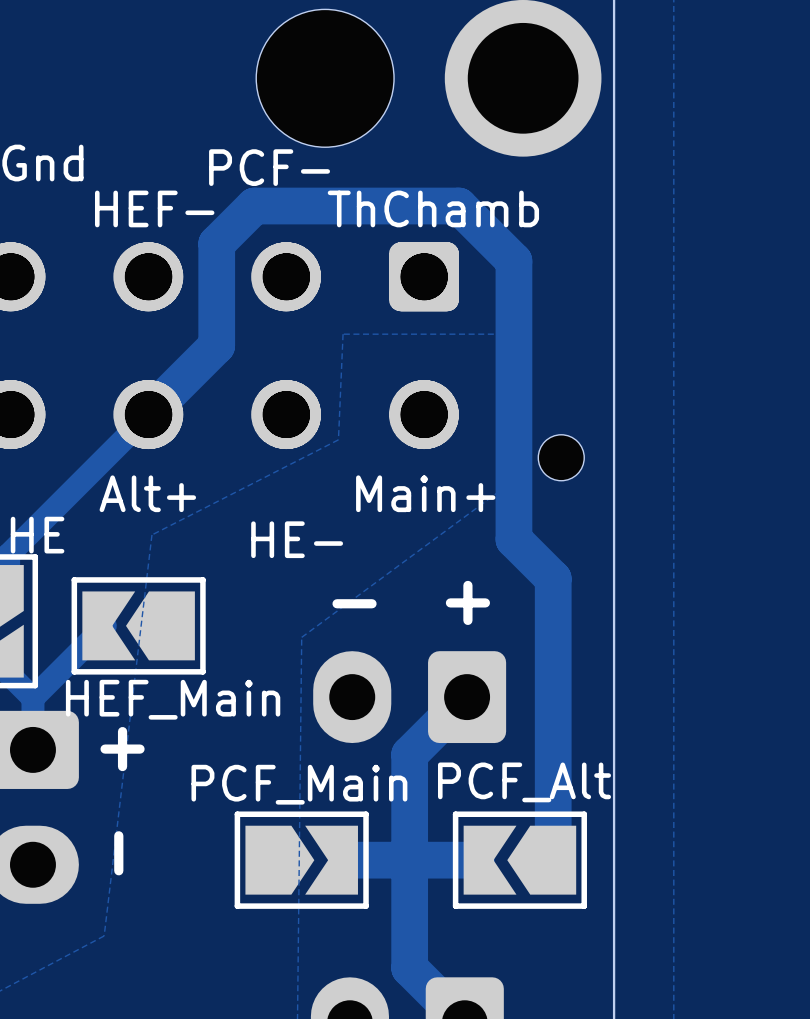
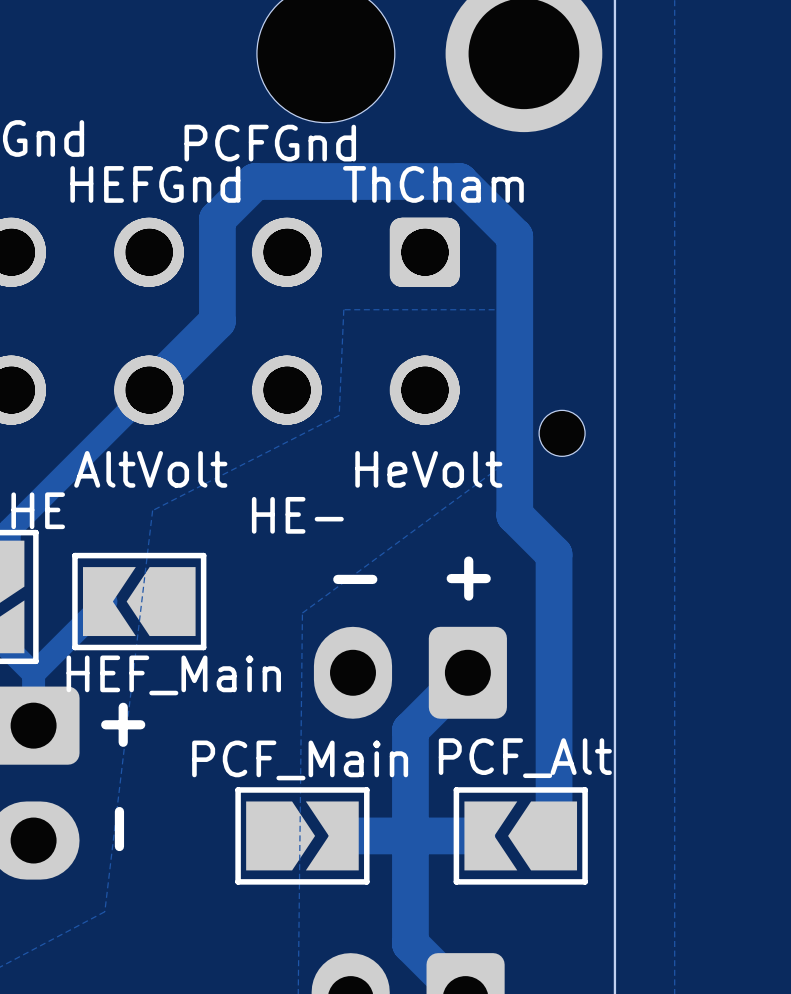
text: PCF- (269, 167) -> PCFGnd (270, 143)
text: HEF- (154, 208) -> HEFGnd (155, 184)
text: ThChamb (433, 208) -> ThCham (433, 184)
text: Alt+ (147, 493) -> AltVolt (150, 469)
text: Main+ (425, 493) -> HeVolt (428, 469)

